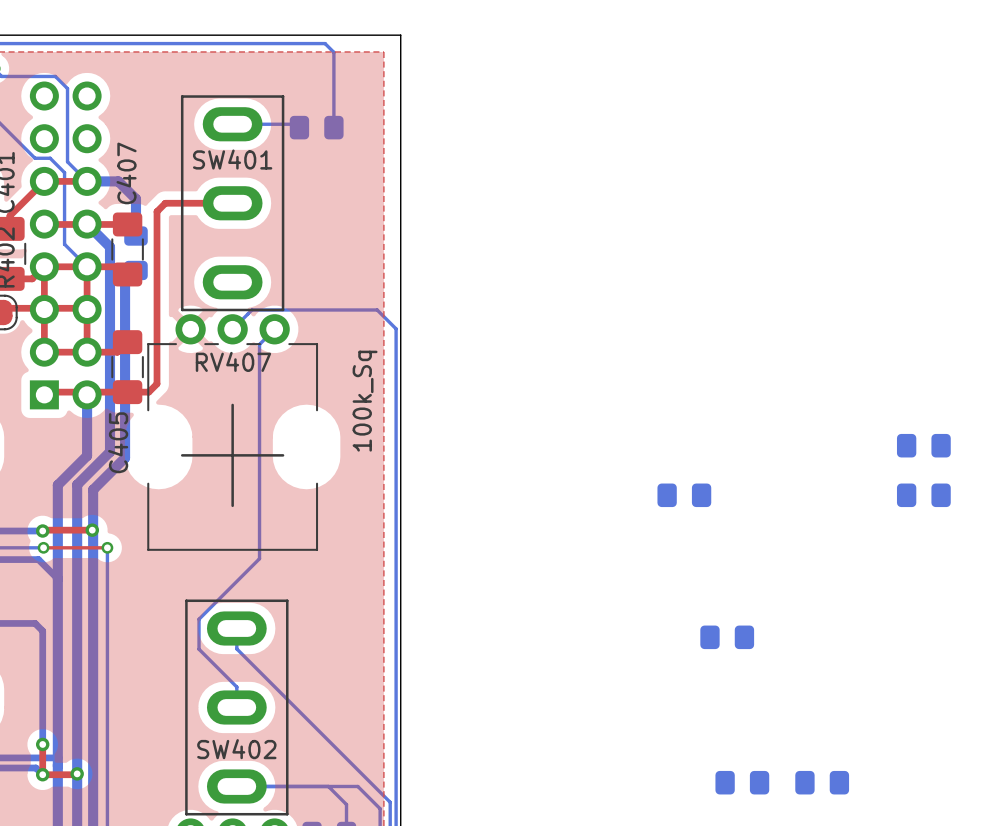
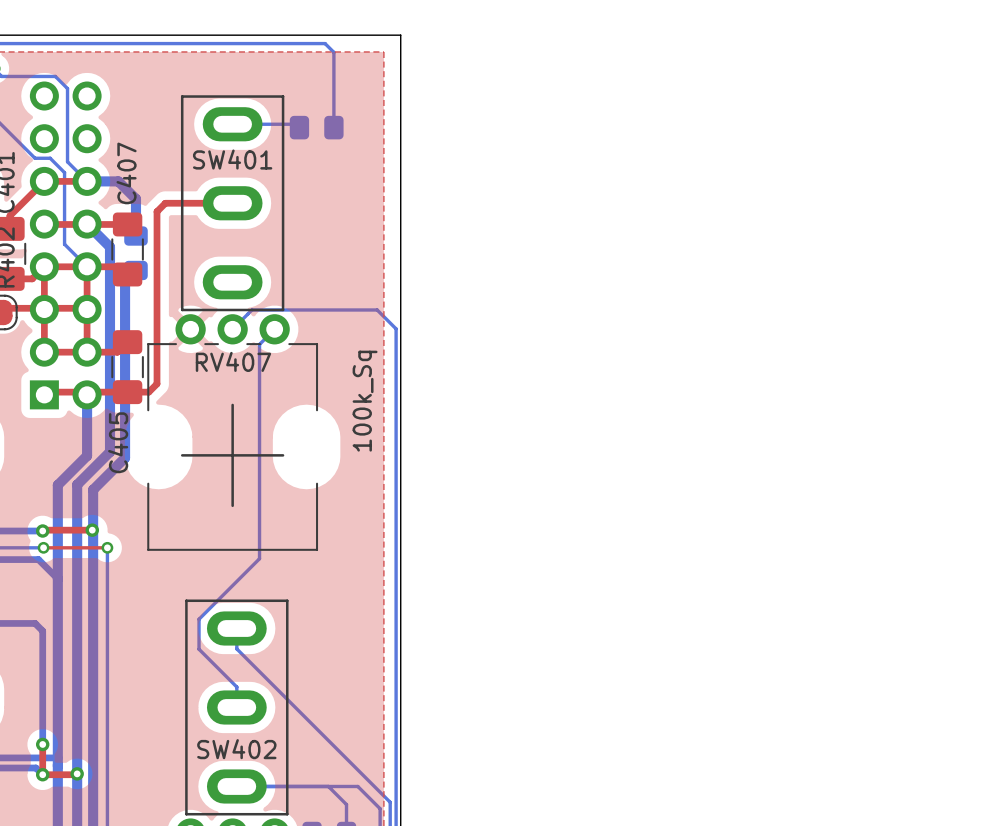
part: (923, 445) -> none
part: (684, 495) -> none
part: (923, 495) -> none
part: (727, 637) -> none
part: (742, 782) -> none
part: (822, 782) -> none

